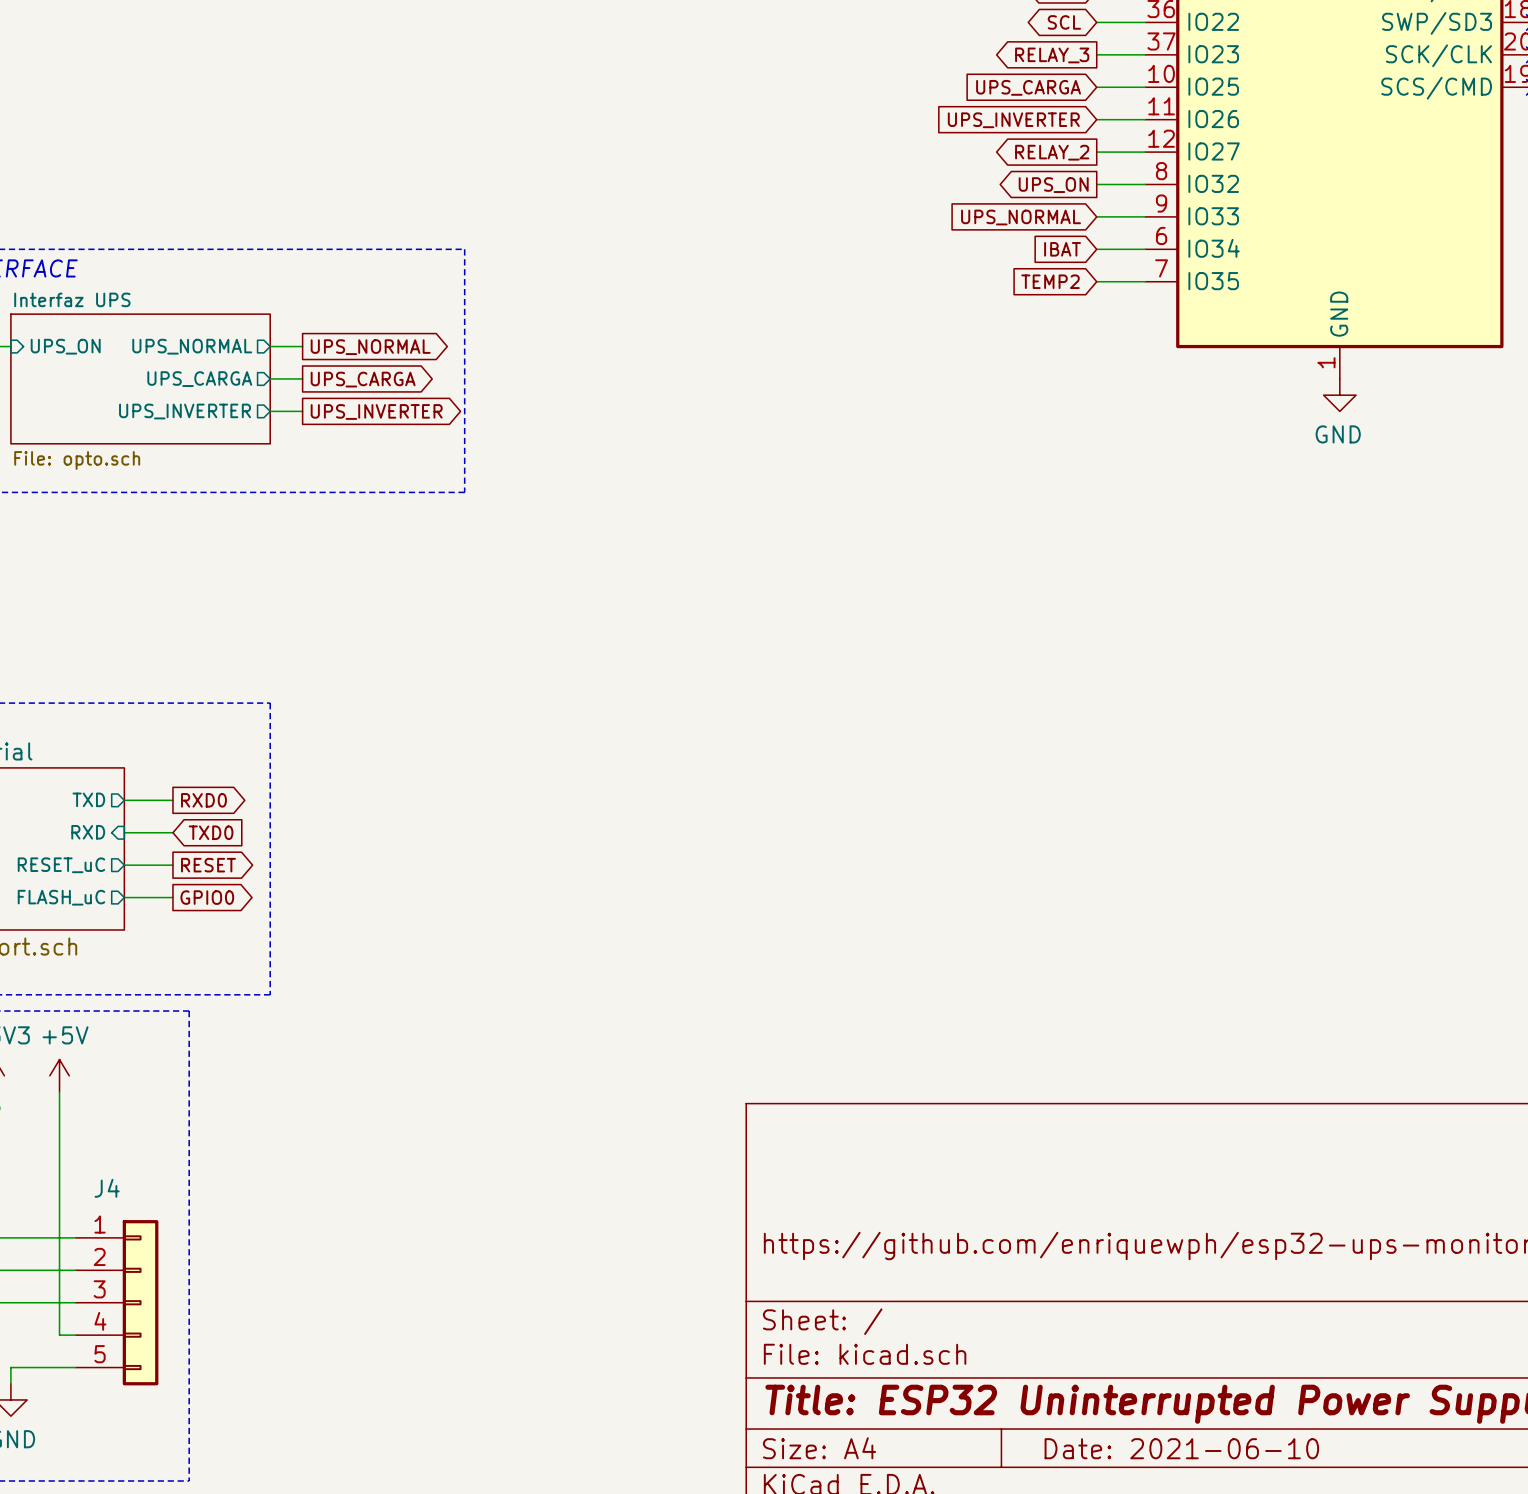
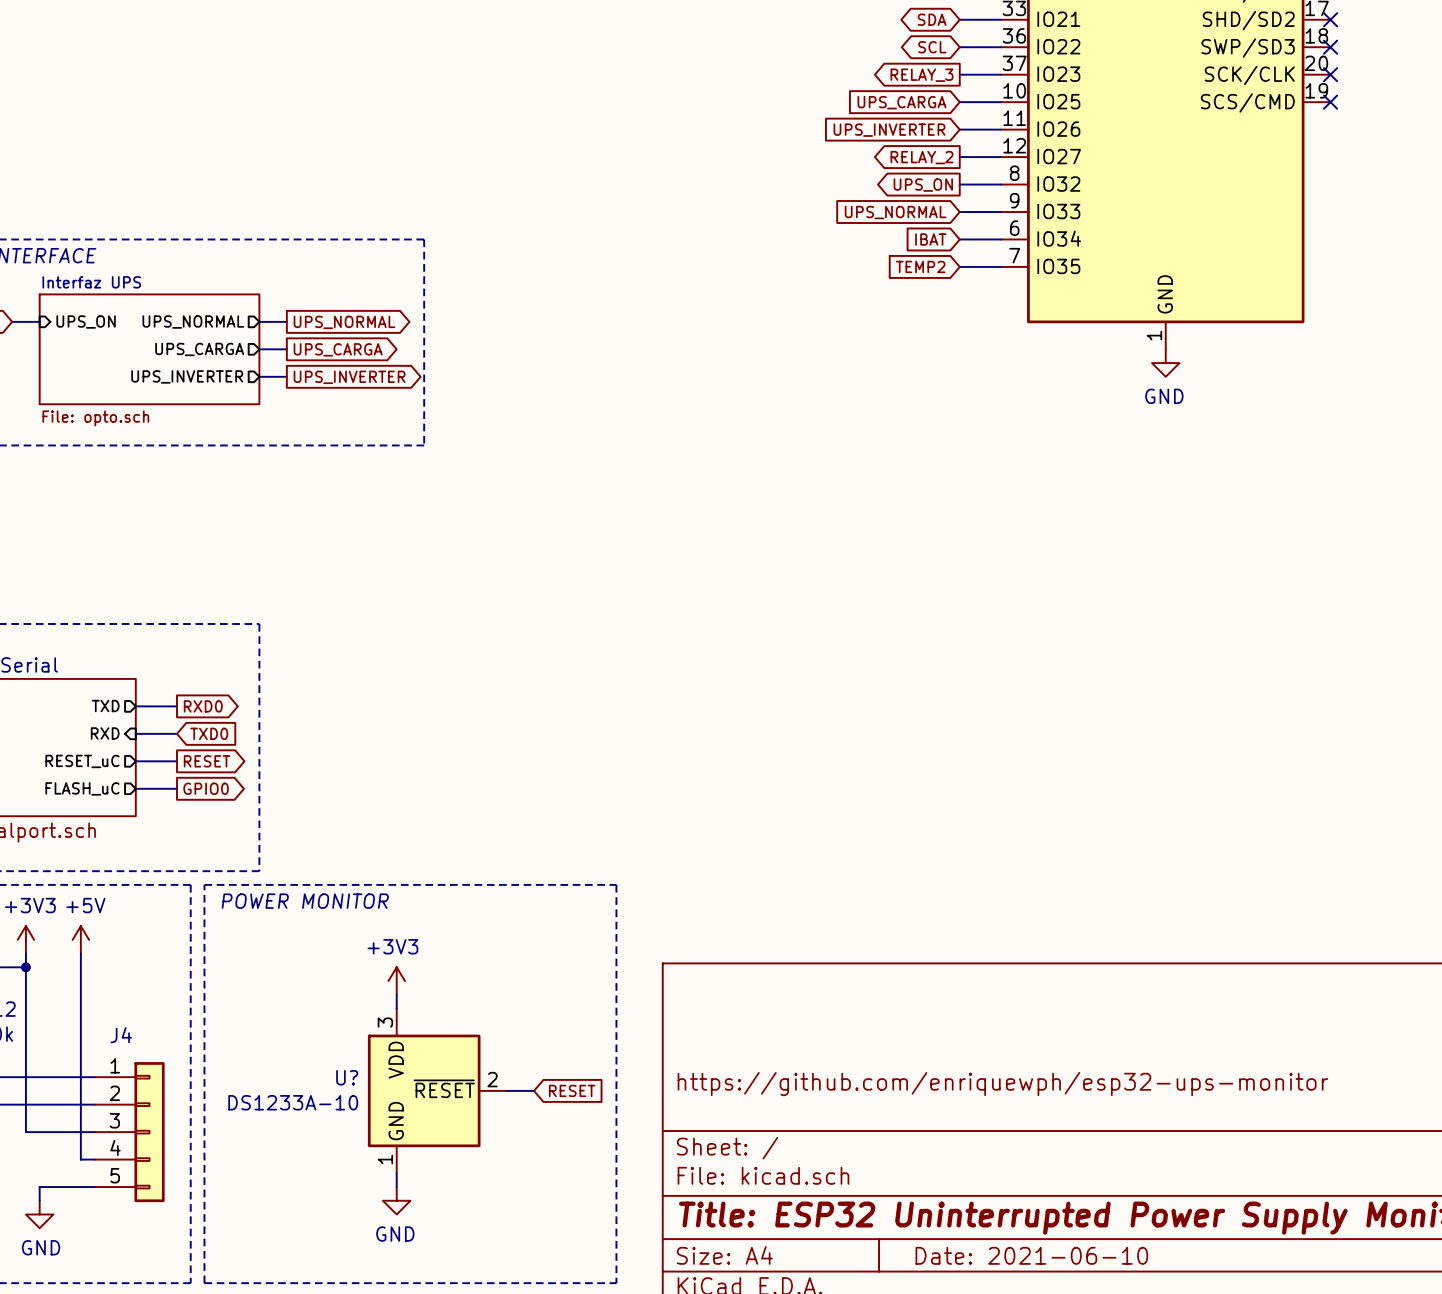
line: none -> (204, 884) (204, 1283) (616, 1283) (616, 884) (204, 884)
text: none -> POWER MONITOR (305, 901)
power symbol: none -> +3V3 (396, 981)
wire: none -> (396, 994) (396, 1008)
U?: none -> DS1233A-10 (437, 1090)
wire: none -> (506, 1090) (534, 1090)
global label: none -> RESET (572, 1090)
wire: none -> (396, 1173) (396, 1187)
power symbol: none -> GND (396, 1200)

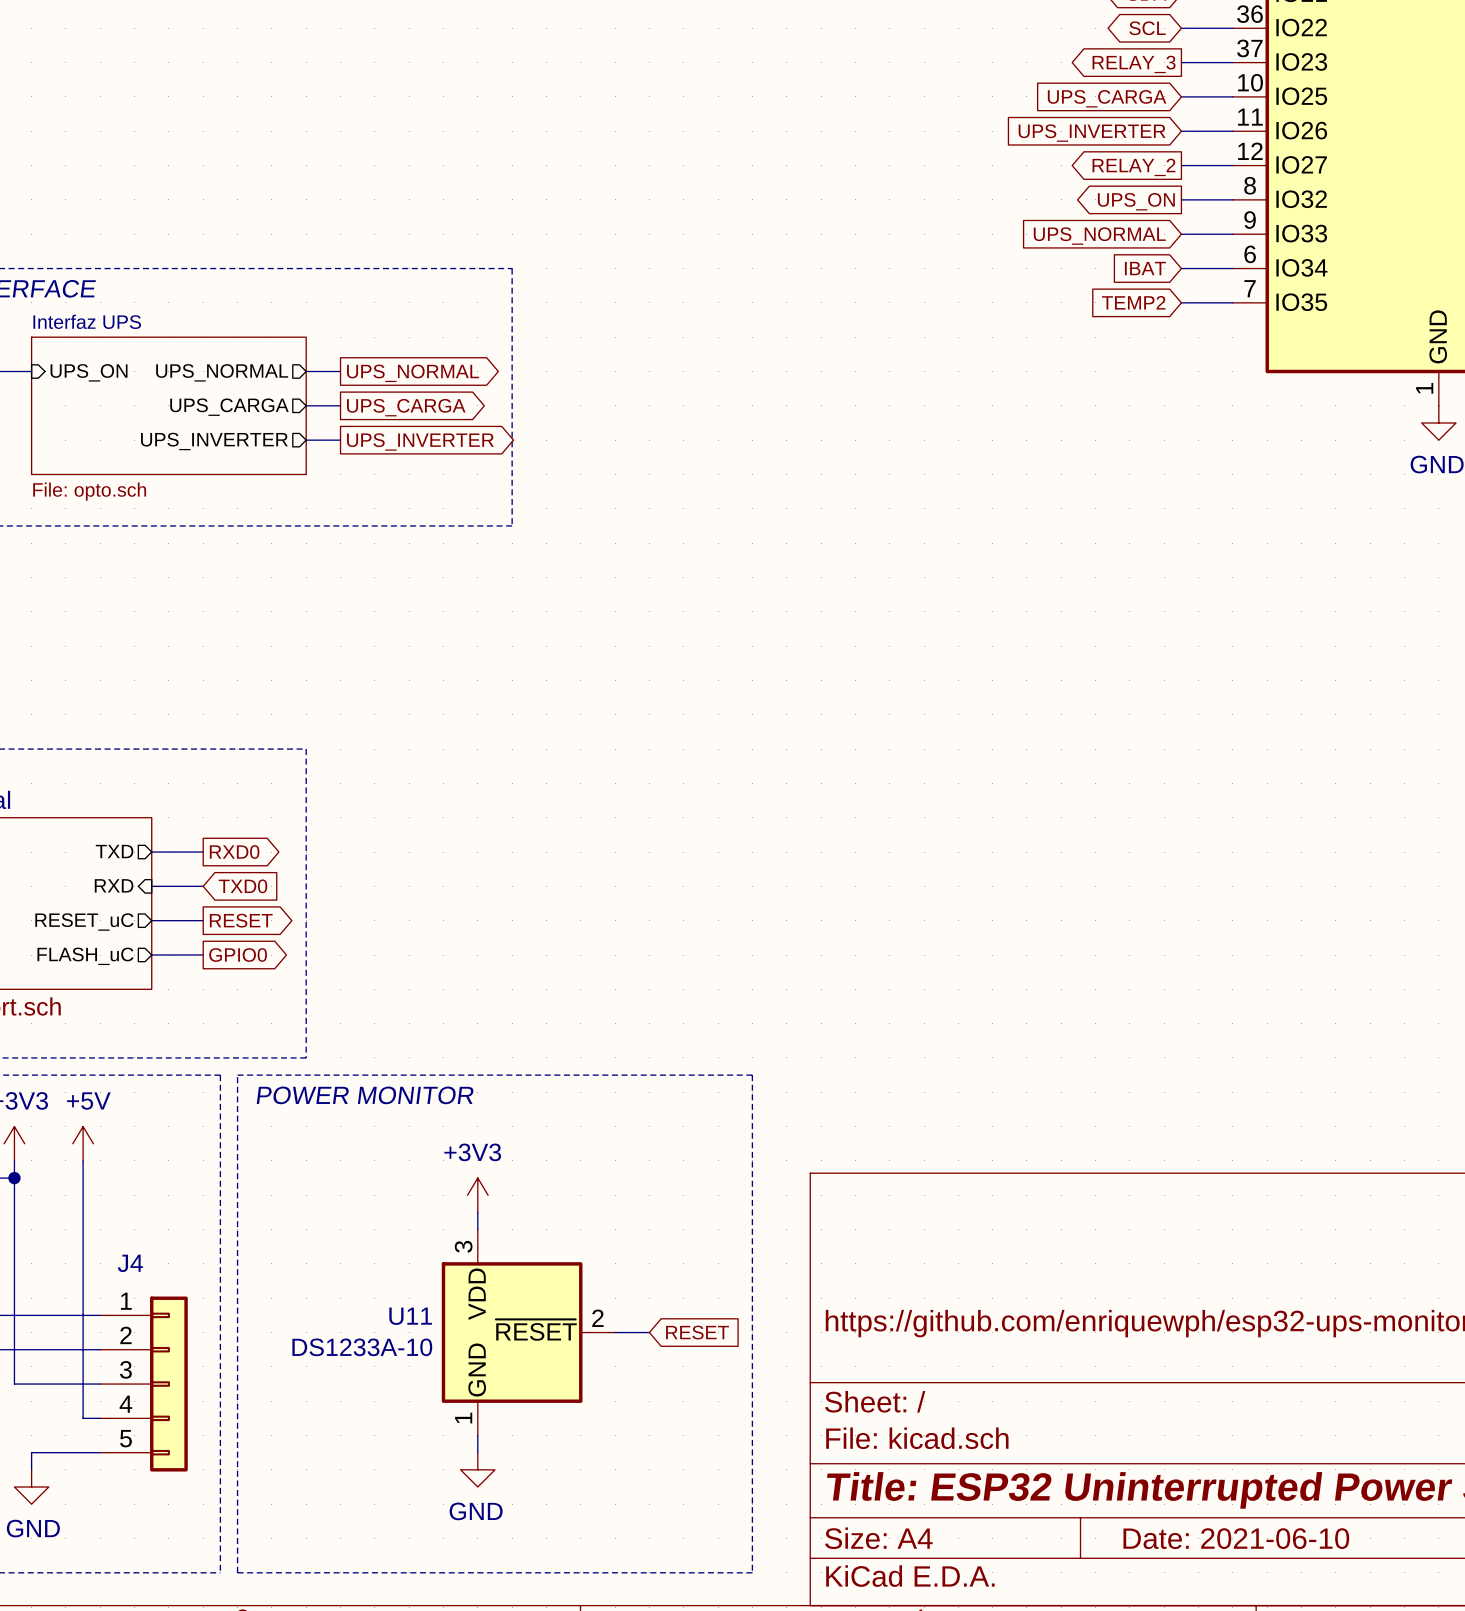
U? name: U? (347, 1077) -> U11 (410, 1316)

